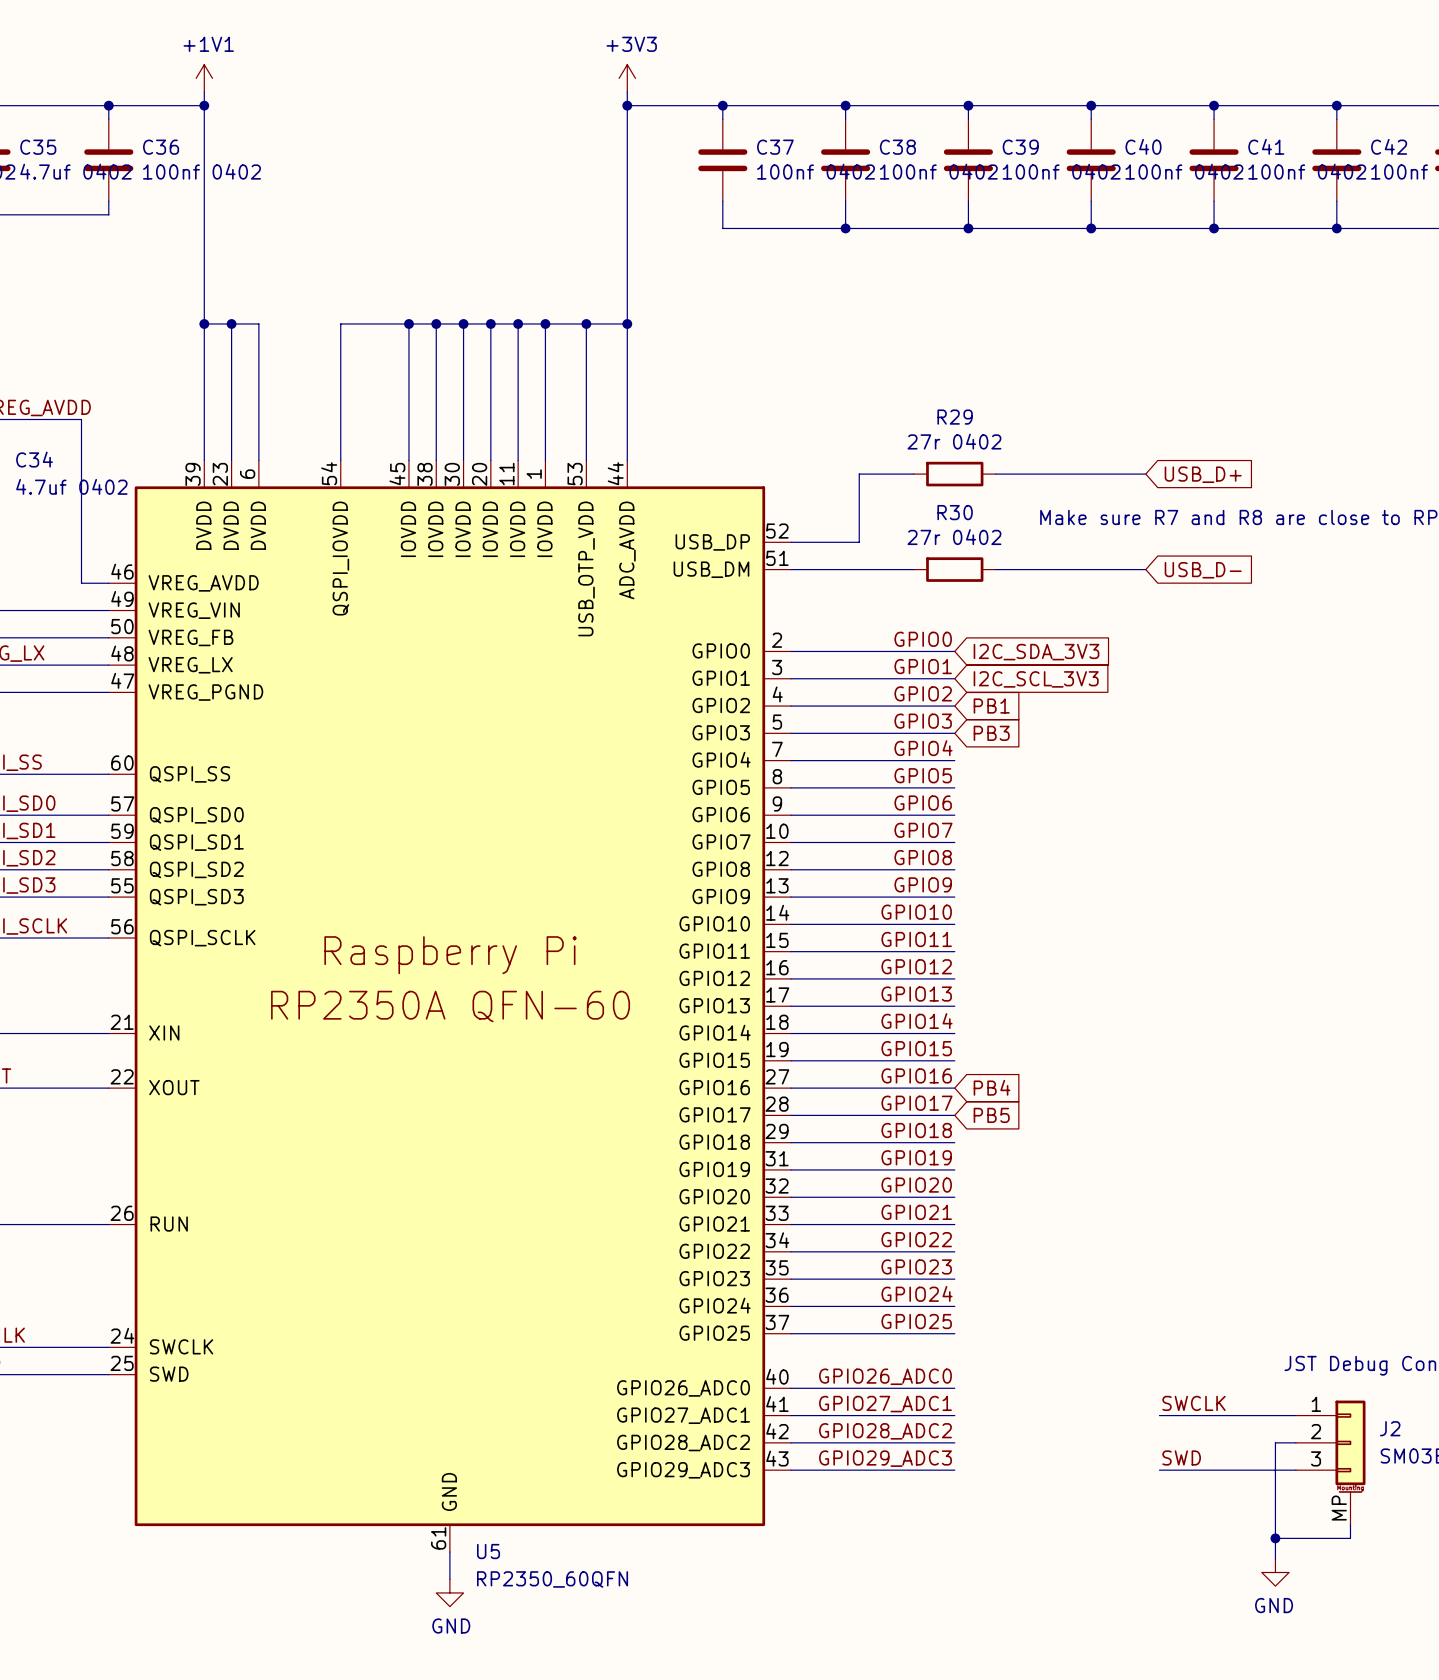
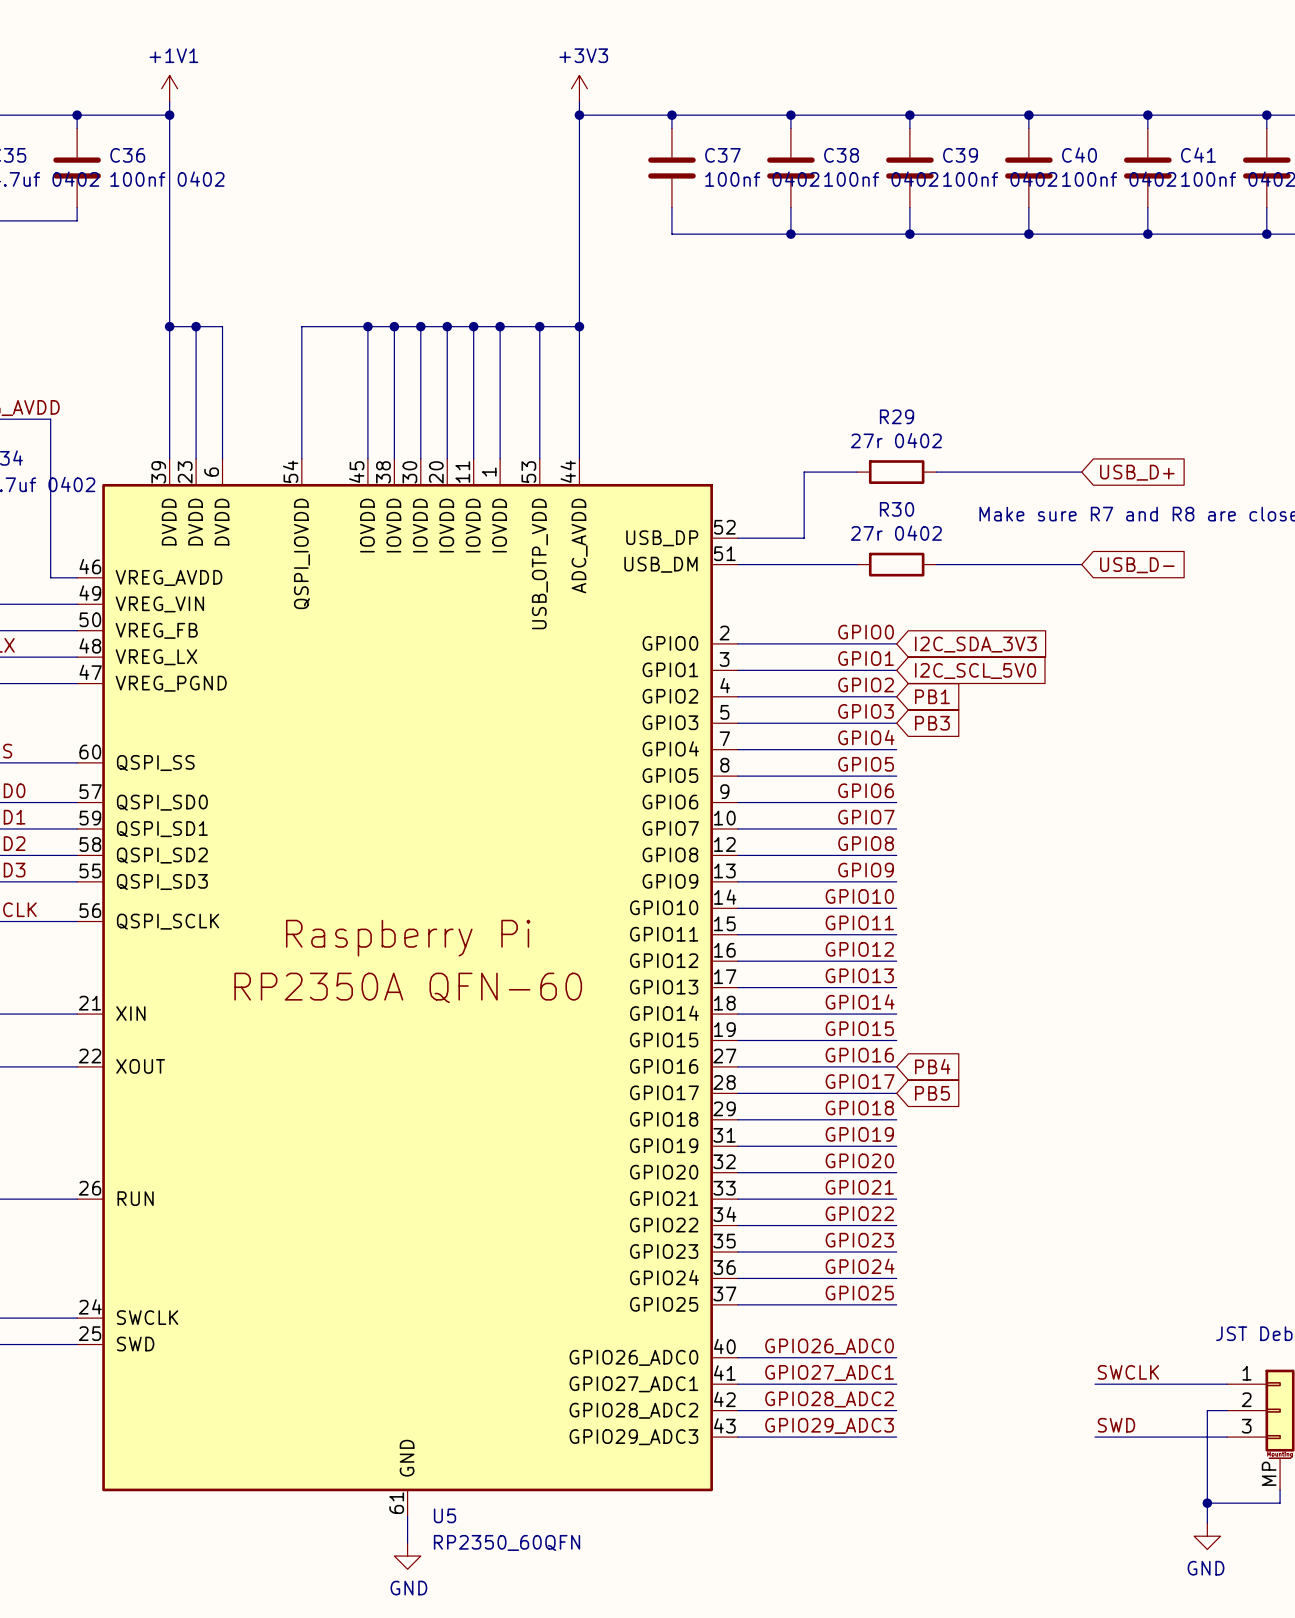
global label: I2C_SCL_3V3 (1036, 679) -> I2C_SCL_5V0 (975, 670)

